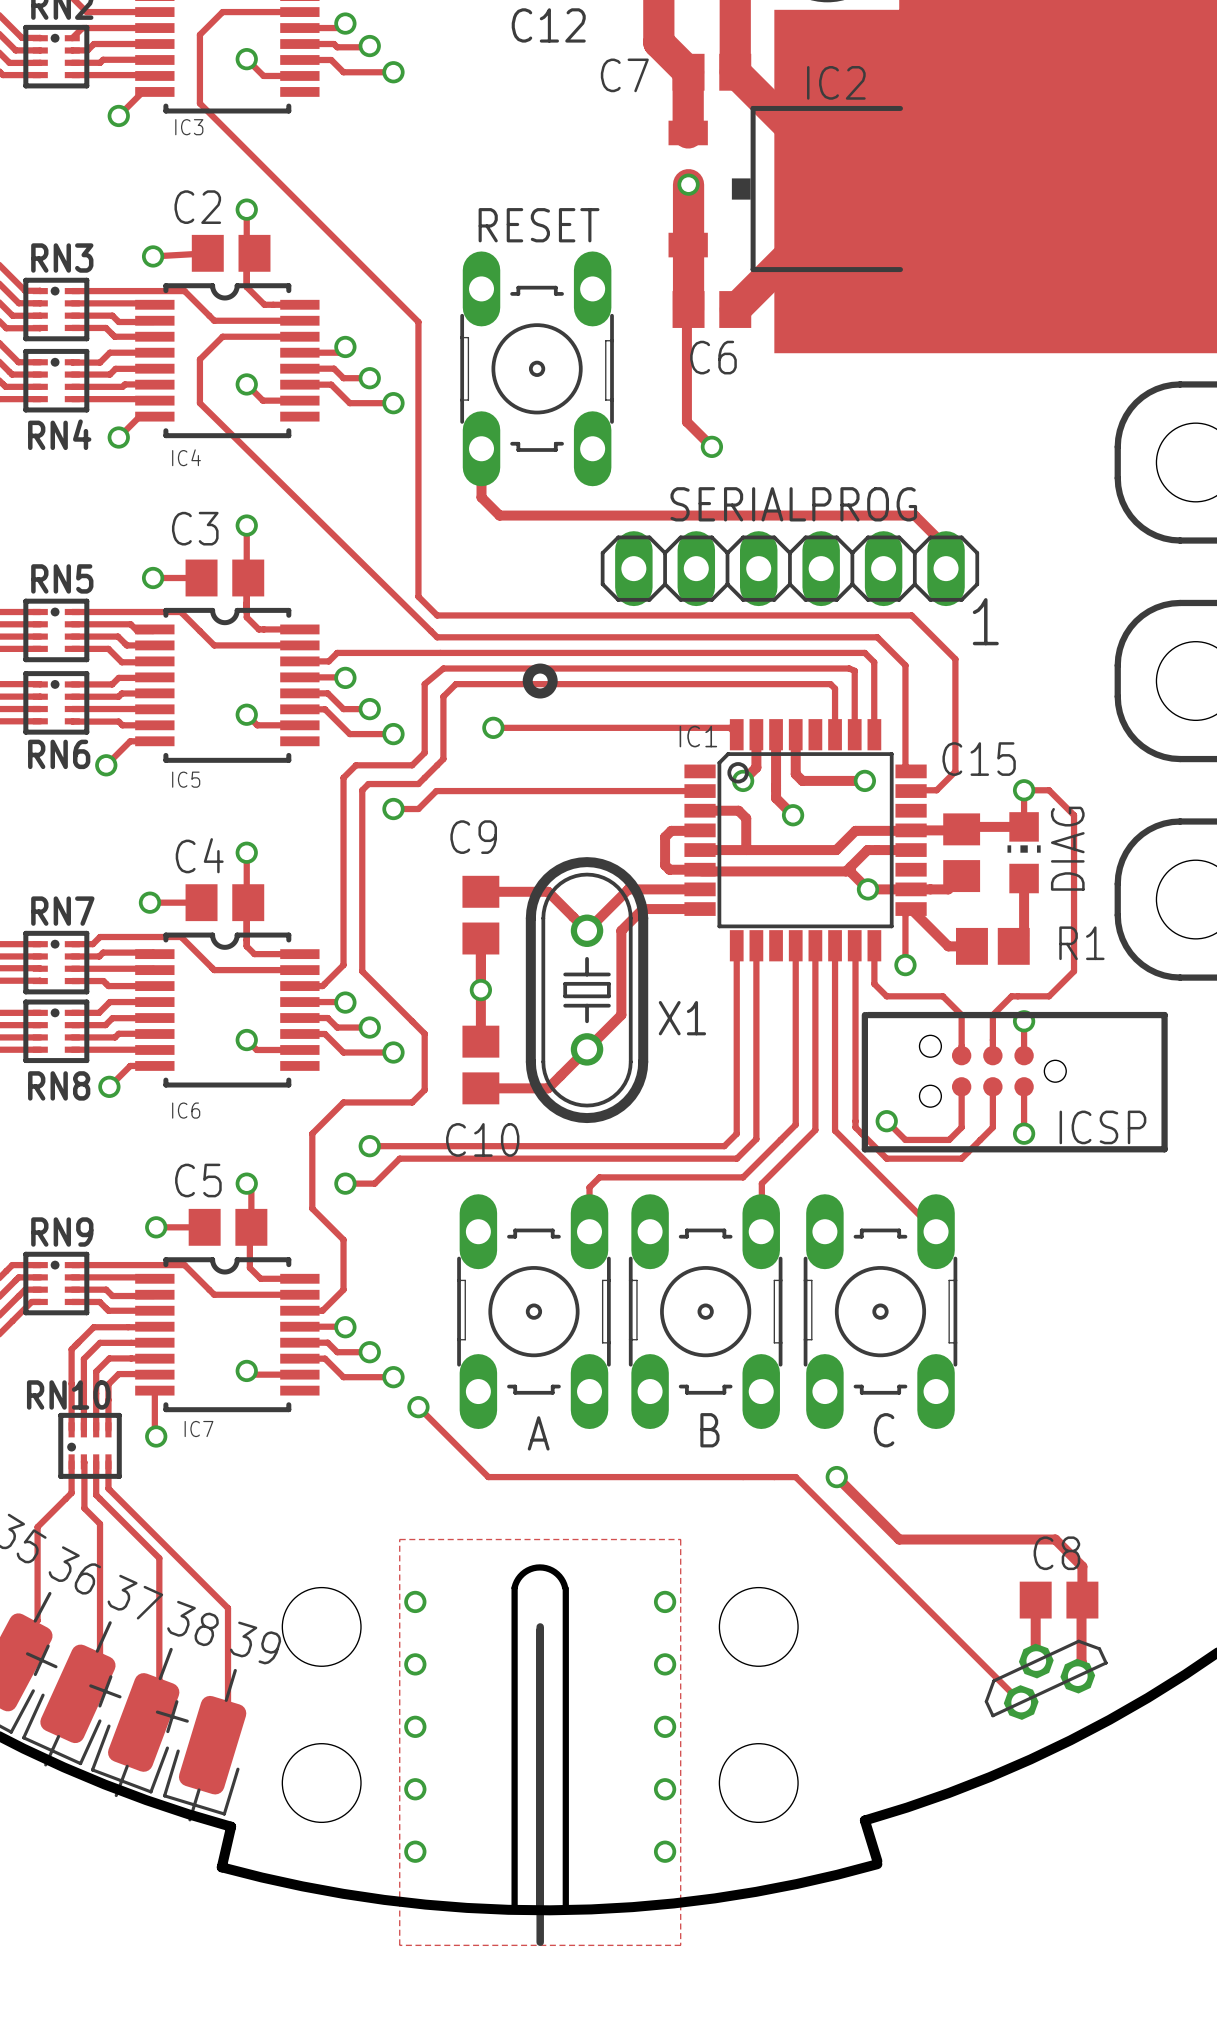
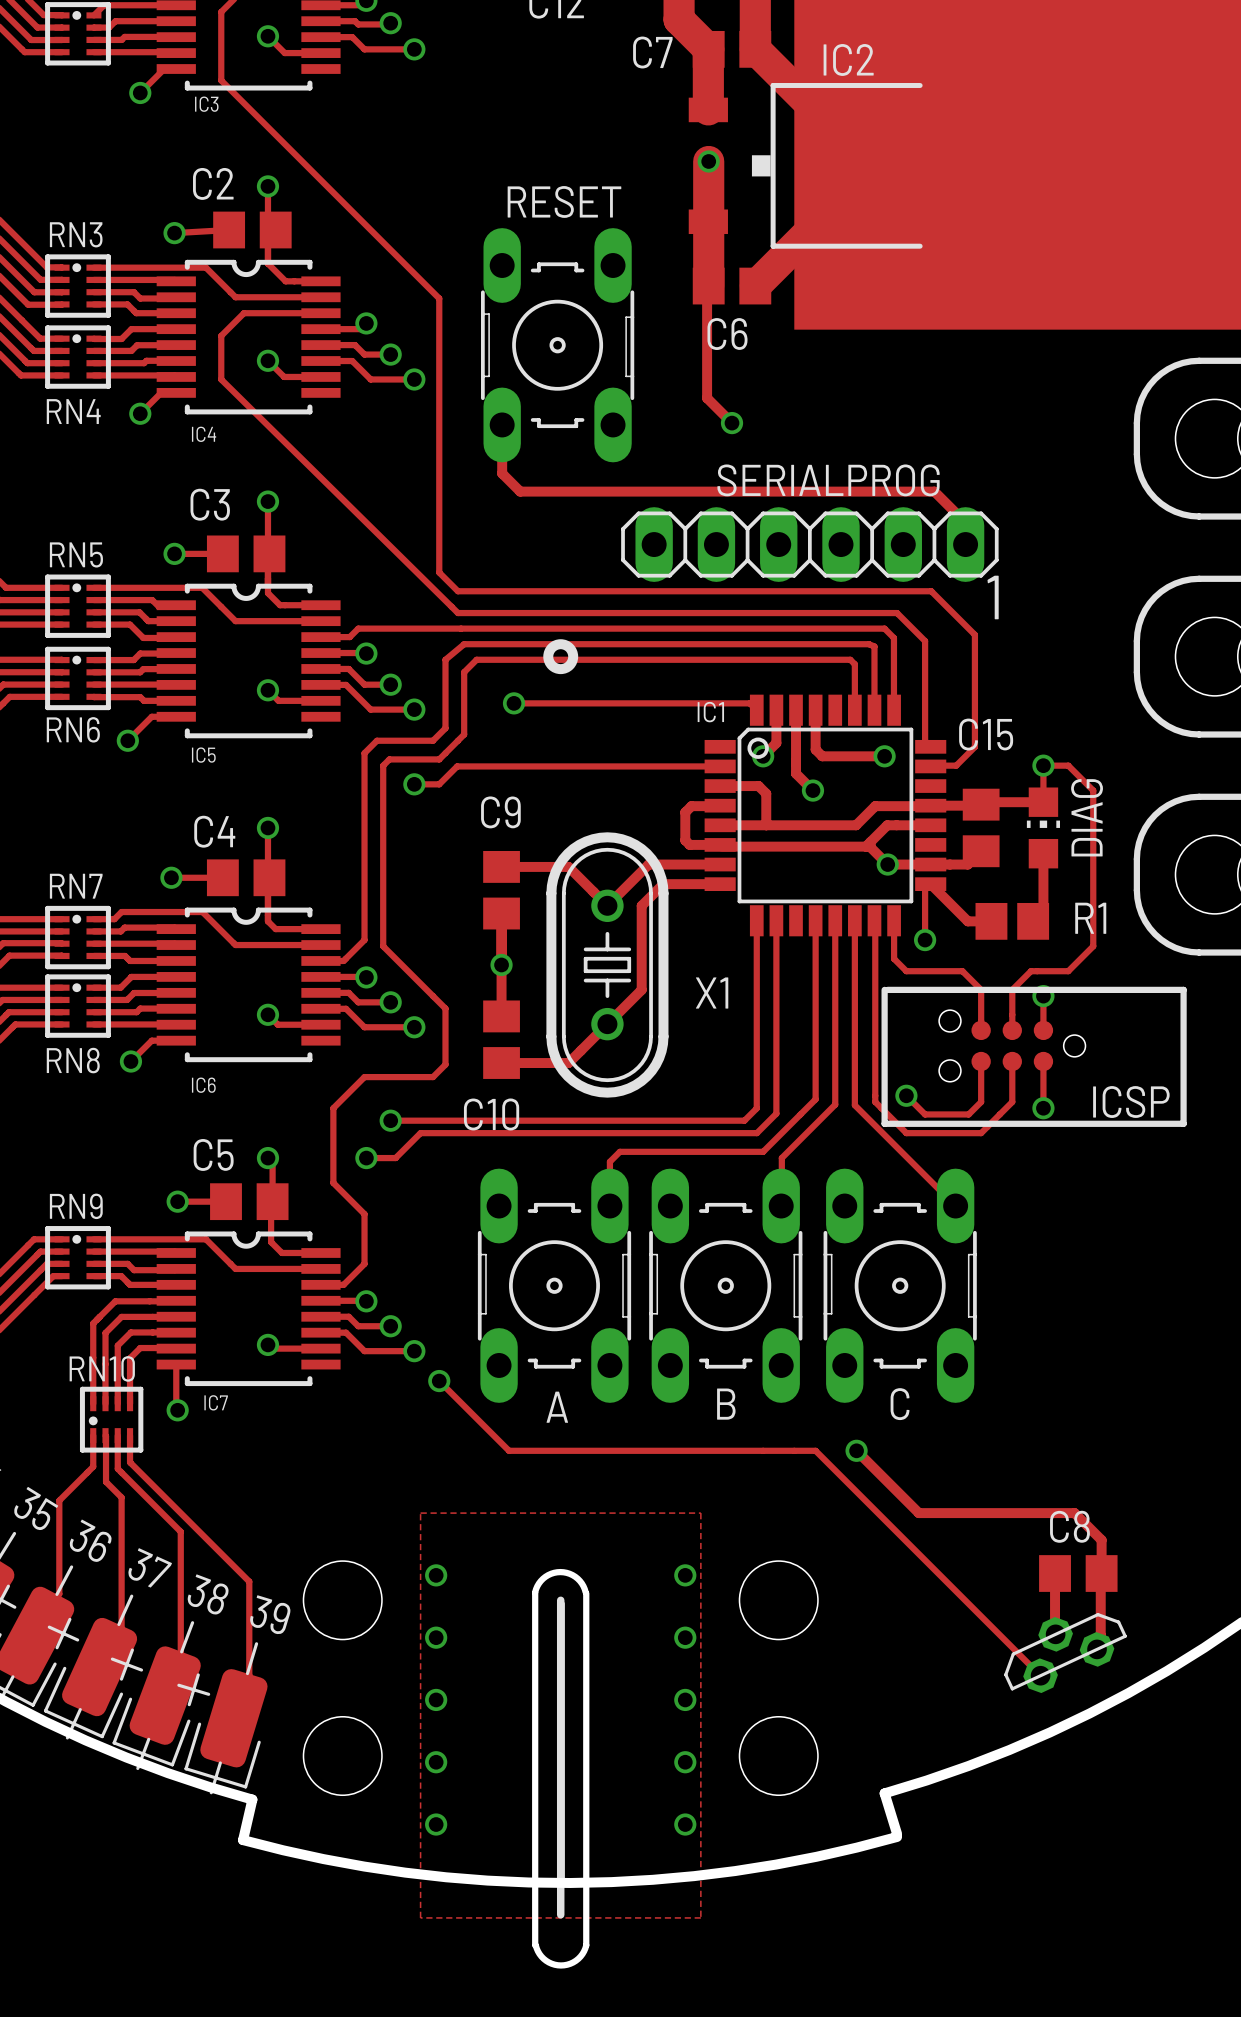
board edge: (514, 1587) (522, 1574) (530, 1569) (539, 1567) (549, 1569) (557, 1574) (565, 1587) -> none
board edge: (514, 1588) (514, 1619) -> (585, 1592) (577, 1578) (569, 1573) (560, 1572) (551, 1573) (543, 1578) (535, 1592)
board edge: (565, 1588) (565, 1620) -> none
board edge: none -> (535, 1883) (535, 1945)
board edge: none -> (586, 1883) (586, 1945) (580, 1956) (567, 1964) (554, 1964) (543, 1958) (535, 1945)

